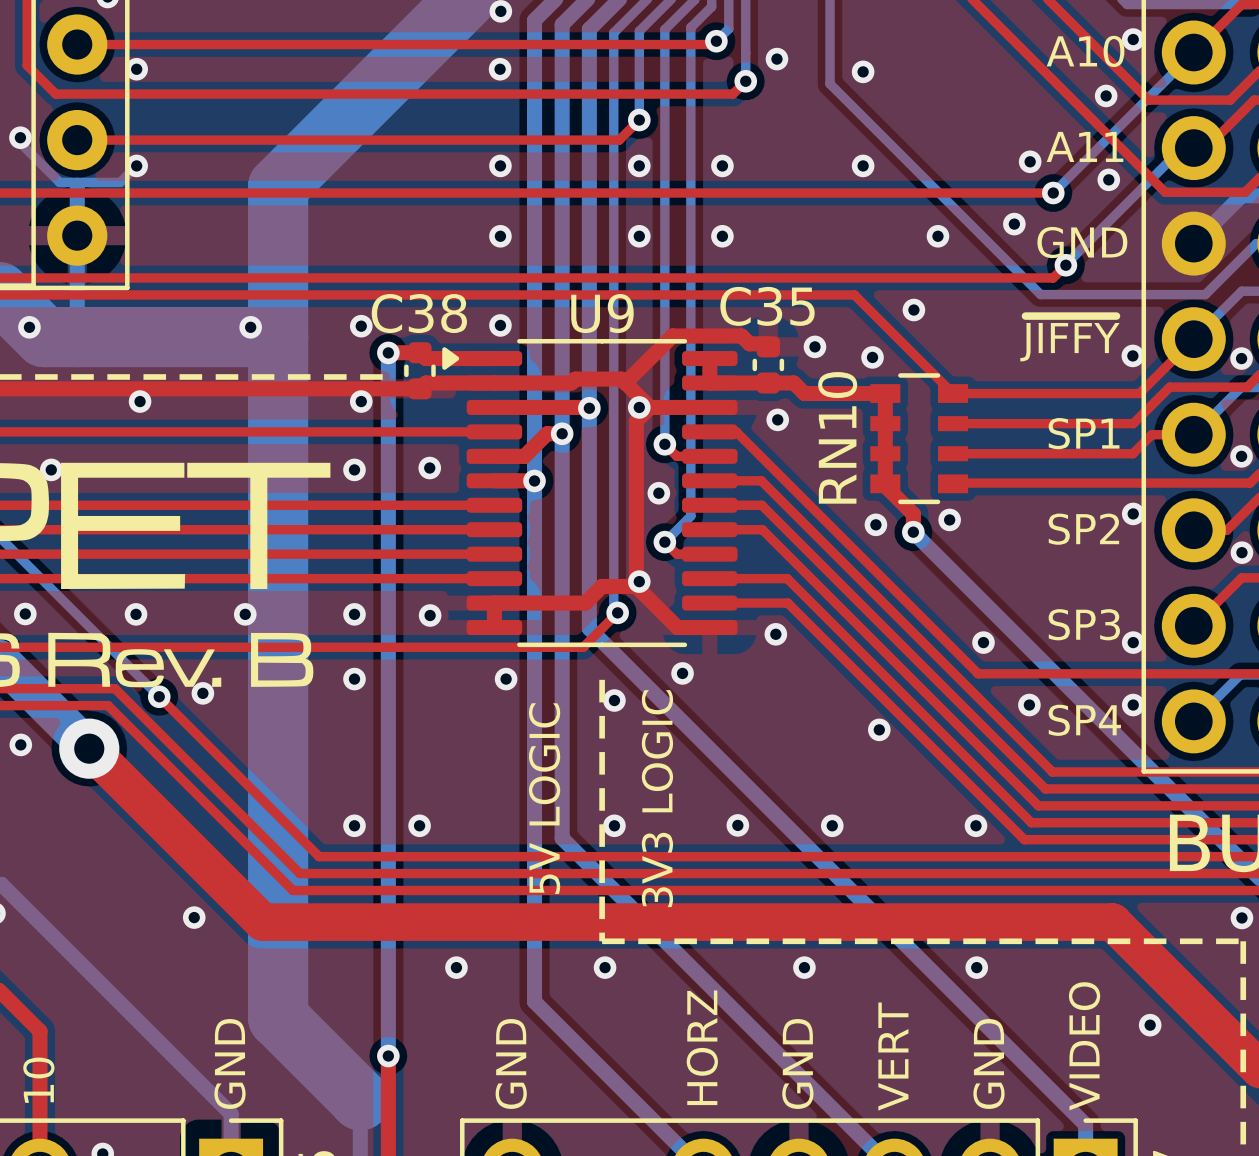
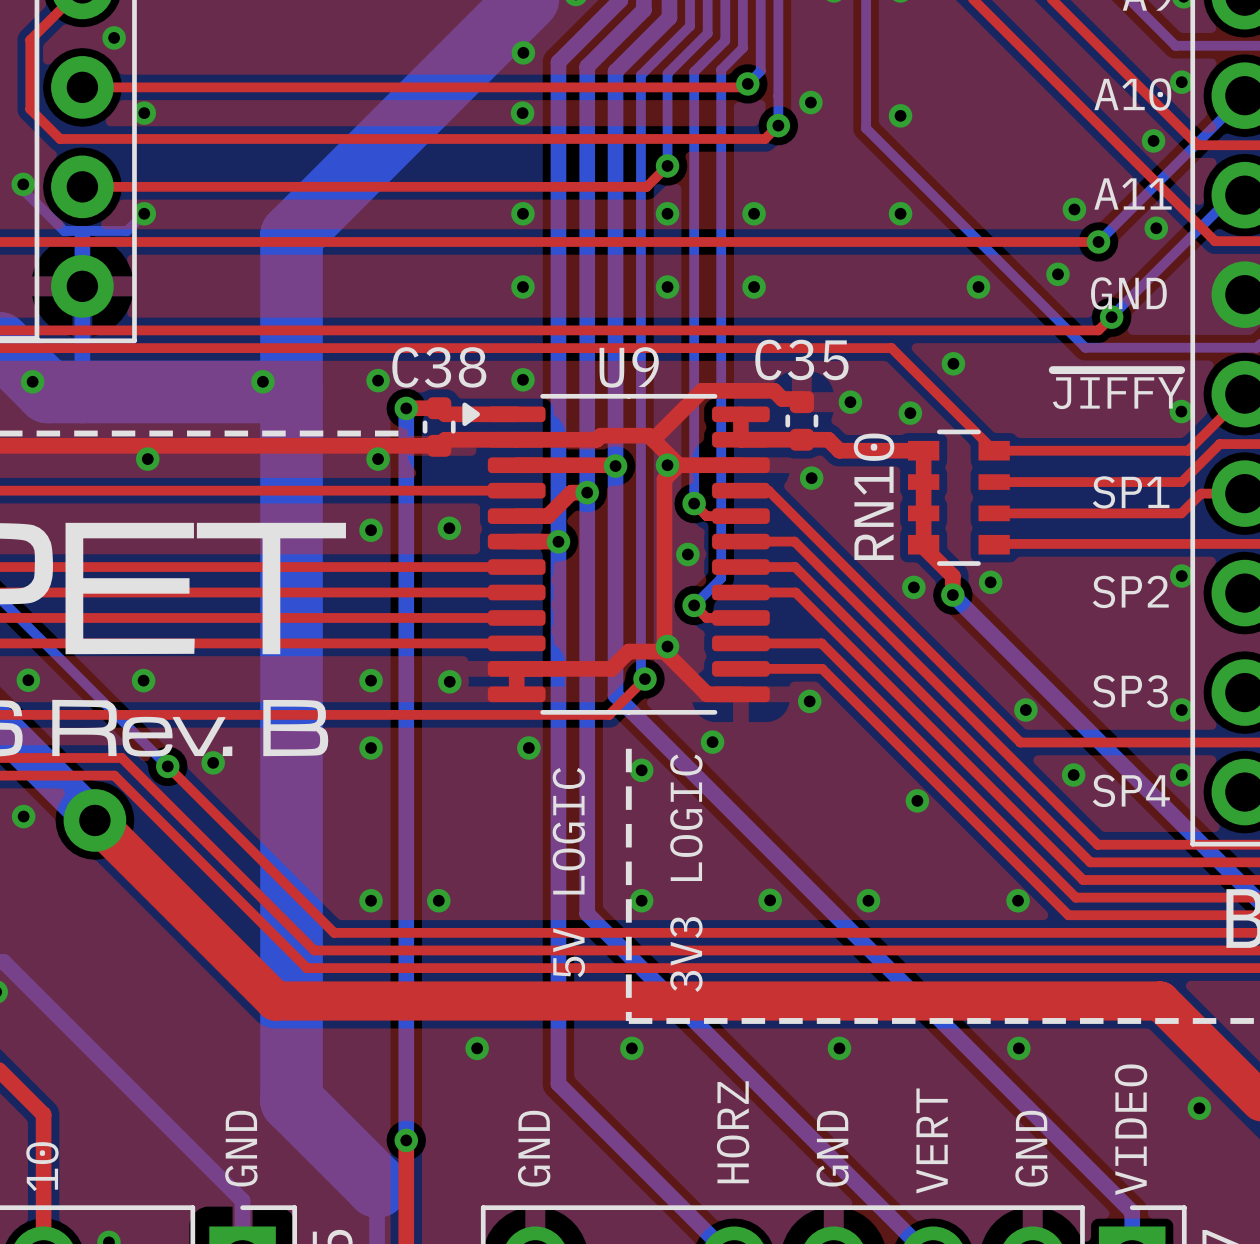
via: (51, 469) -> none
via: (245, 614) -> none
via: (194, 917) -> none

